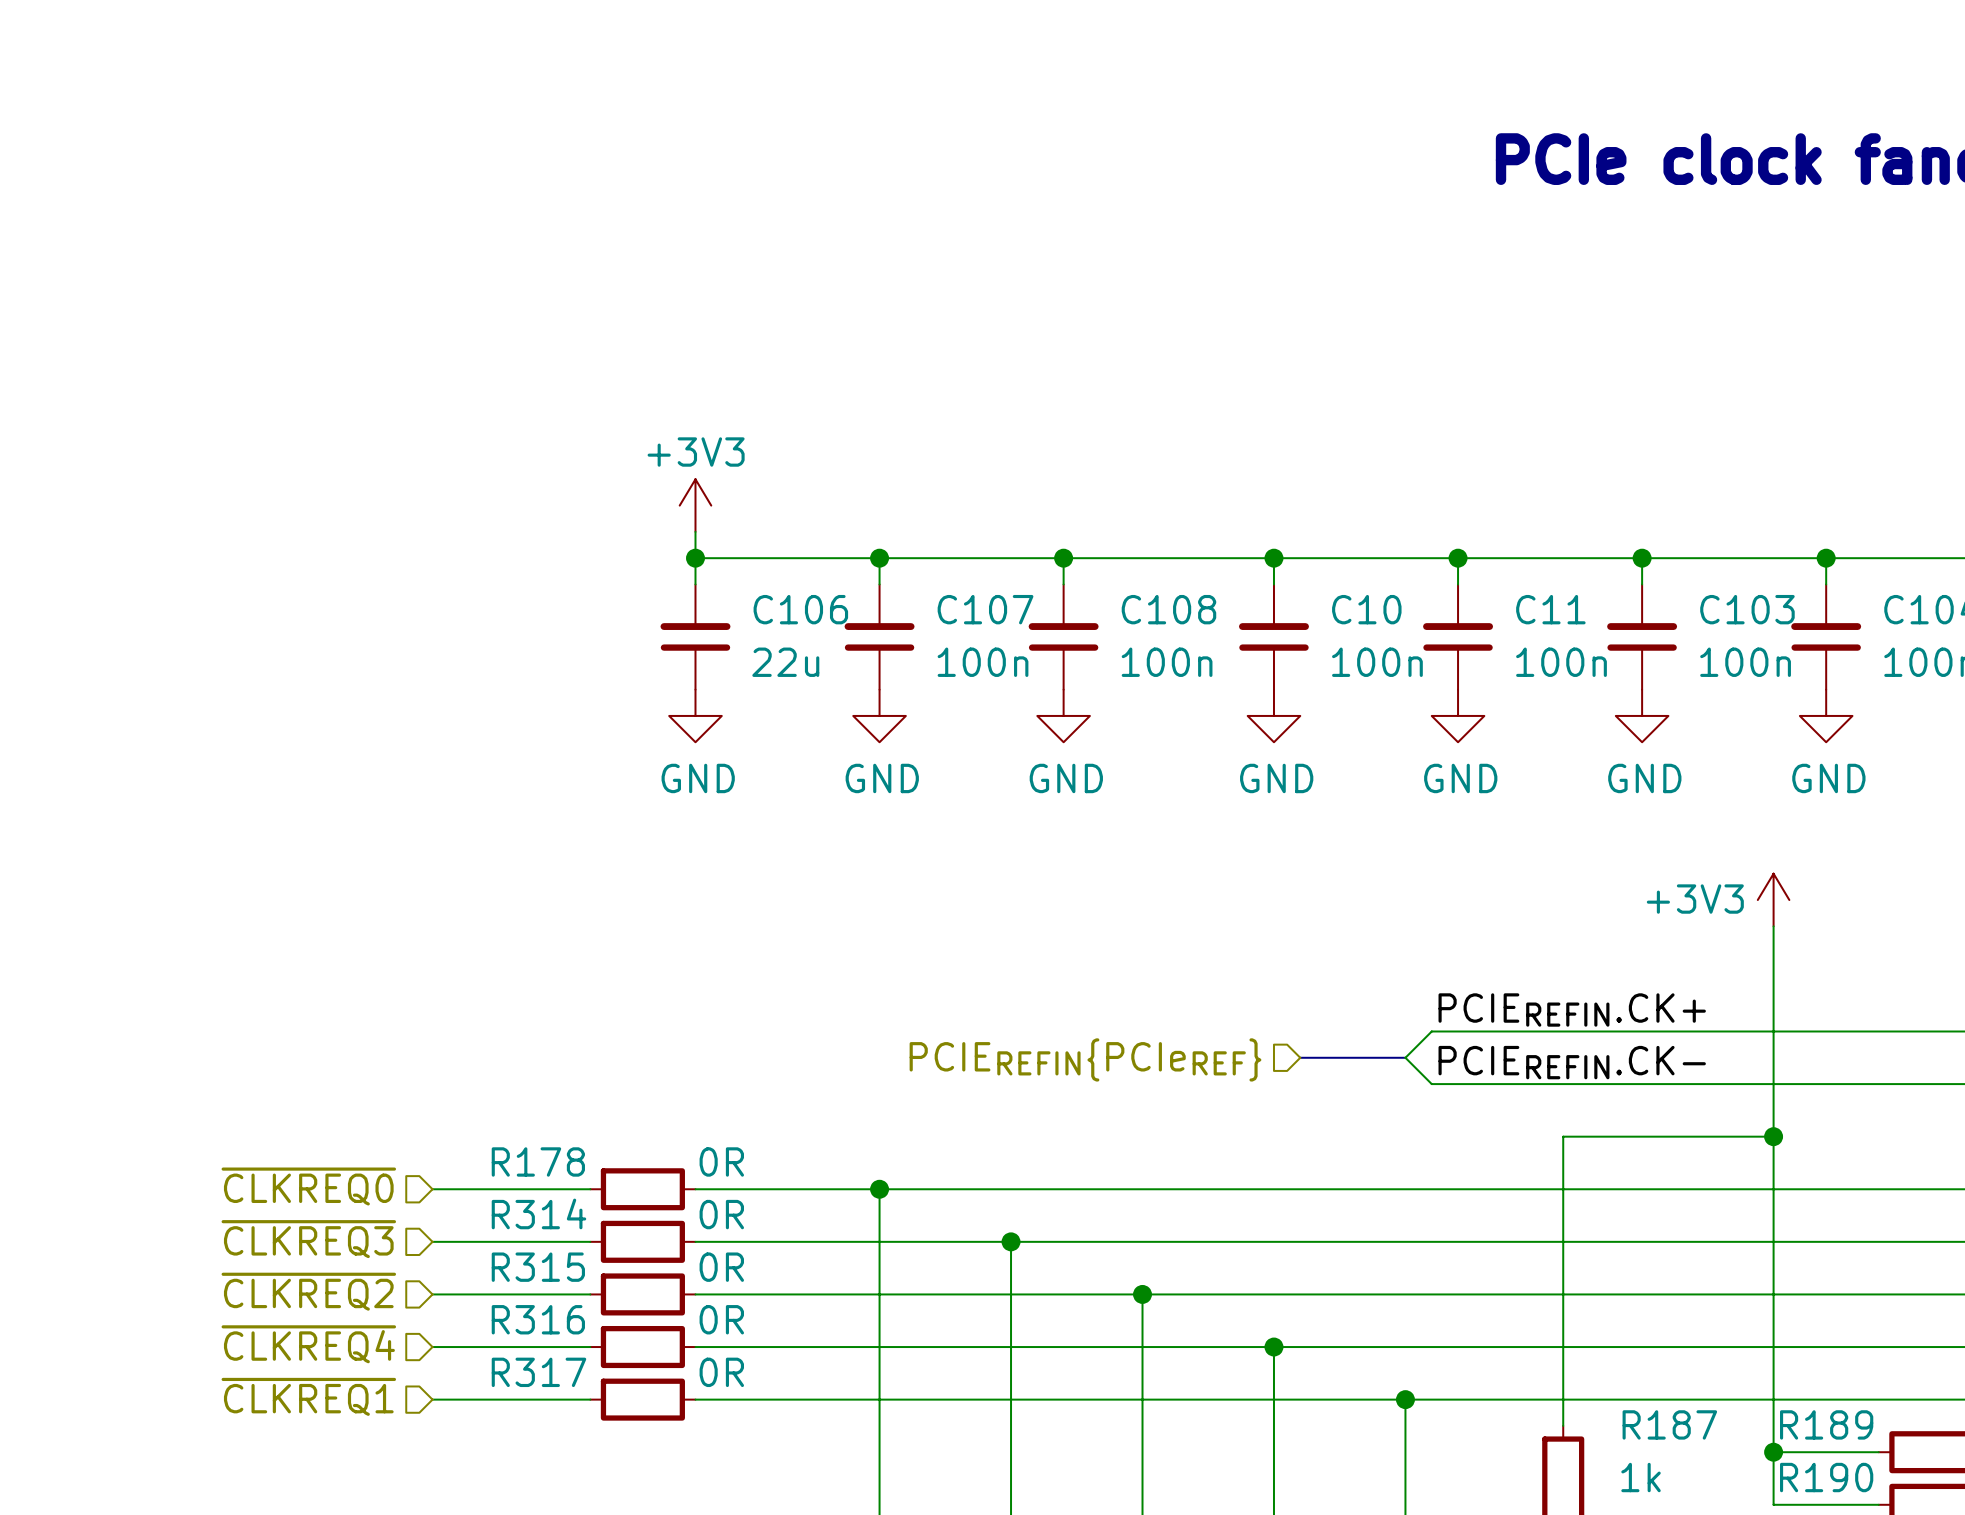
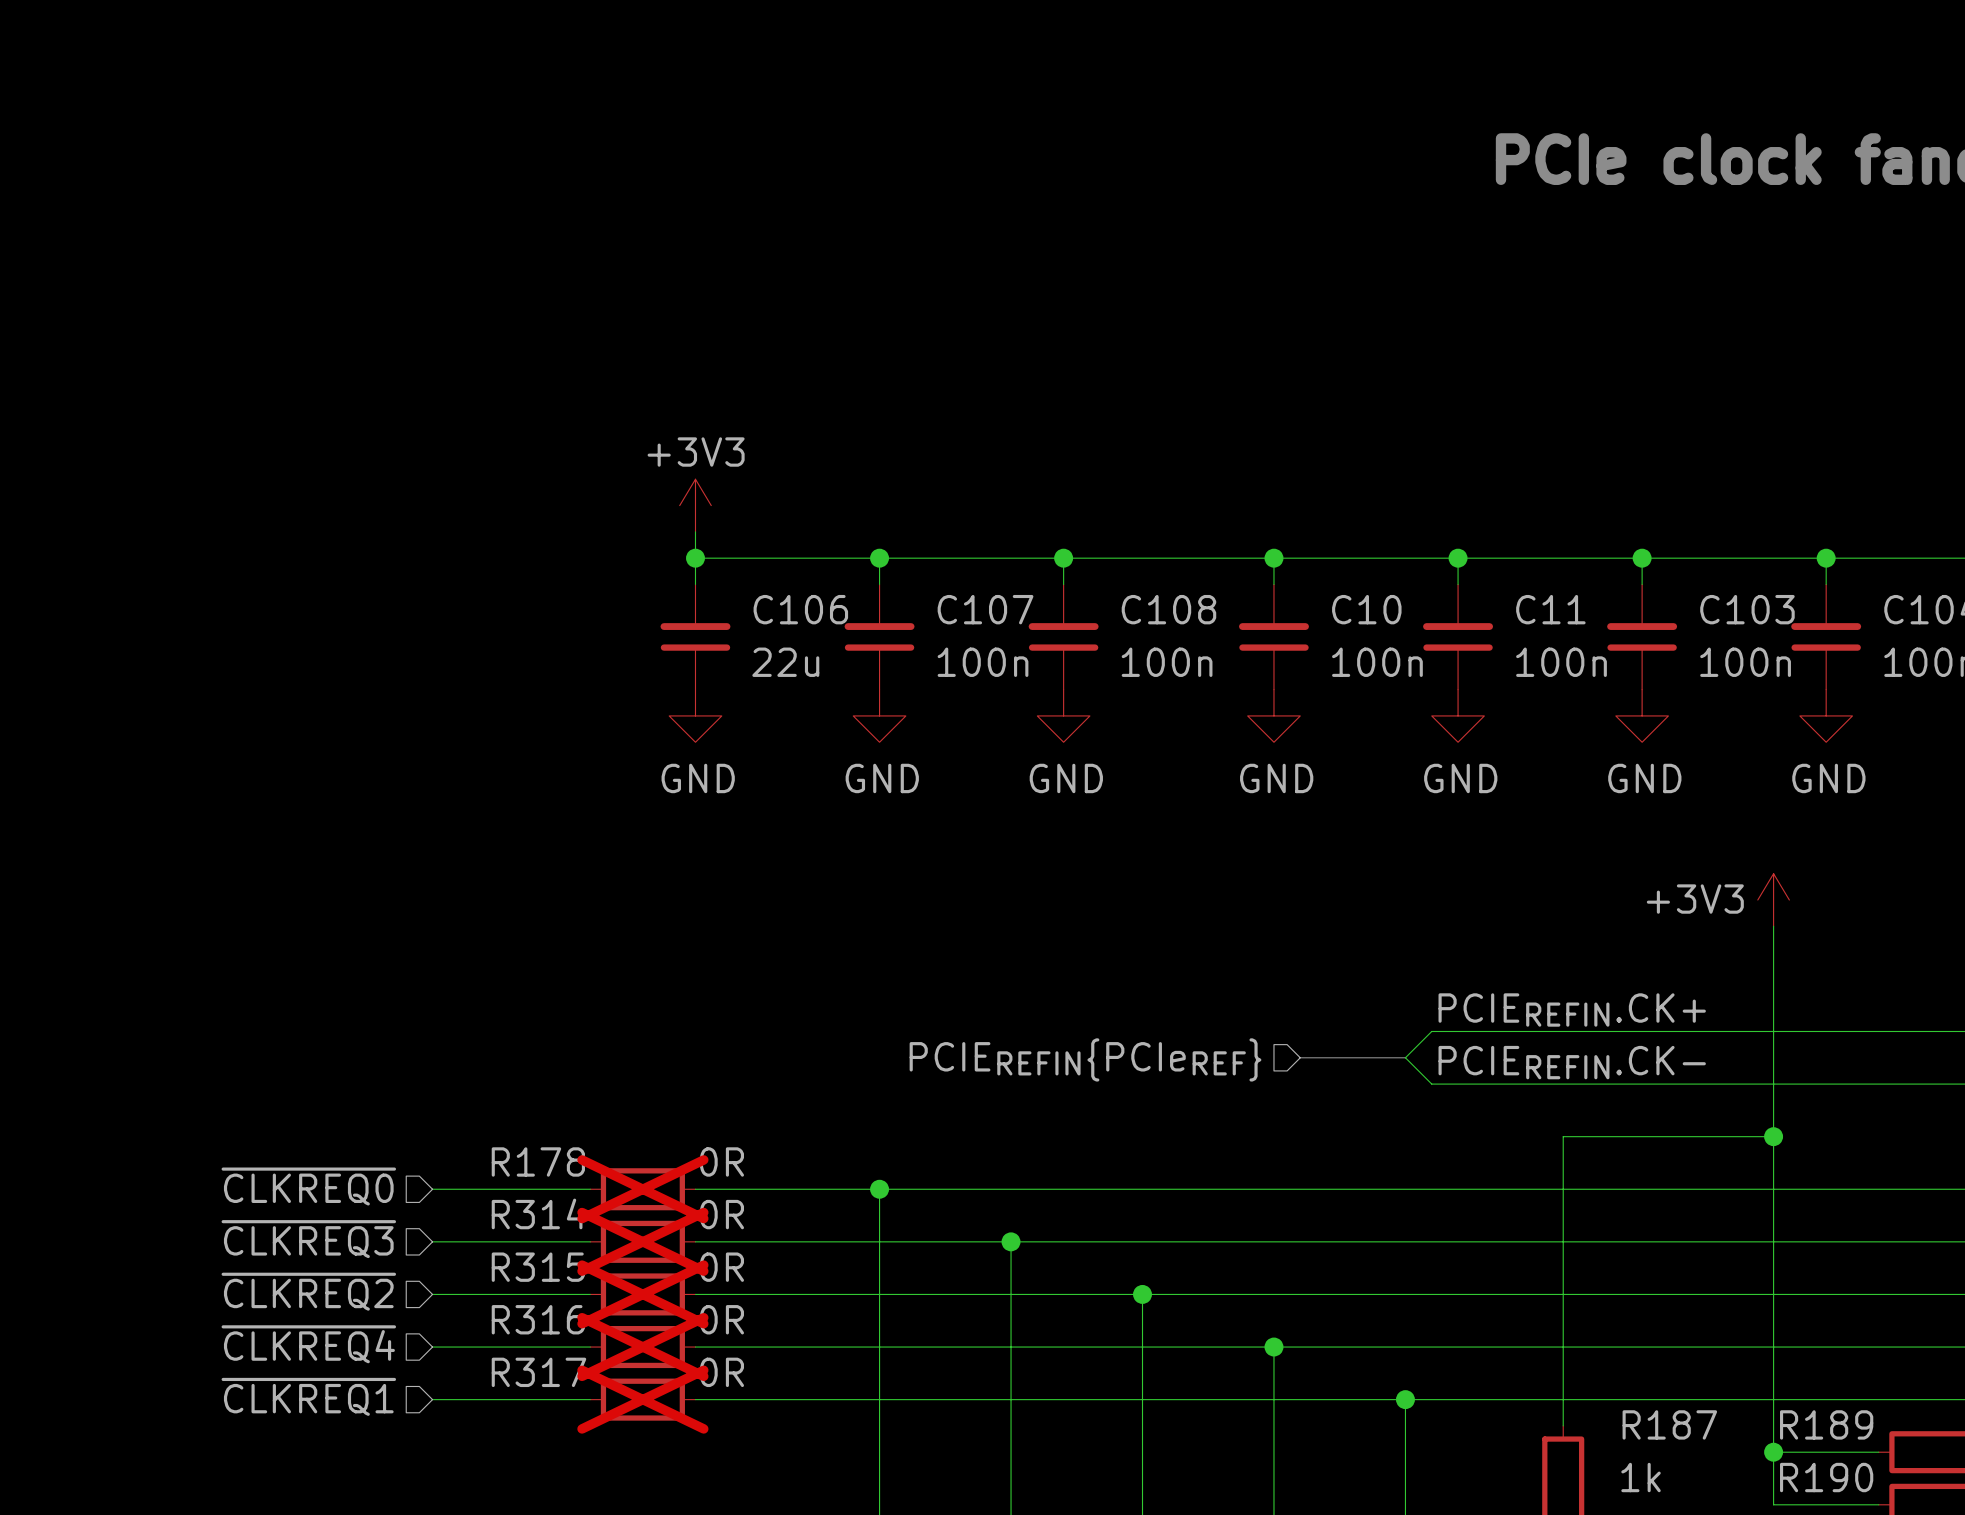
R178 do-not-place cross: none -> (642, 1189)
R314 do-not-place cross: none -> (642, 1241)
R315 do-not-place cross: none -> (642, 1294)
R316 do-not-place cross: none -> (642, 1347)
R317 do-not-place cross: none -> (642, 1399)

